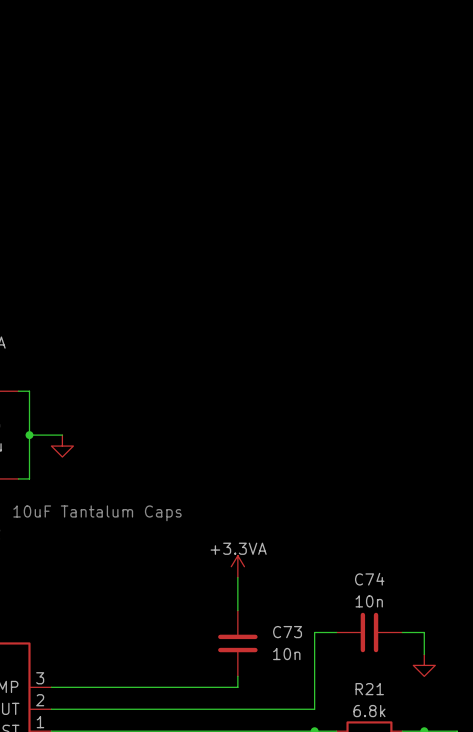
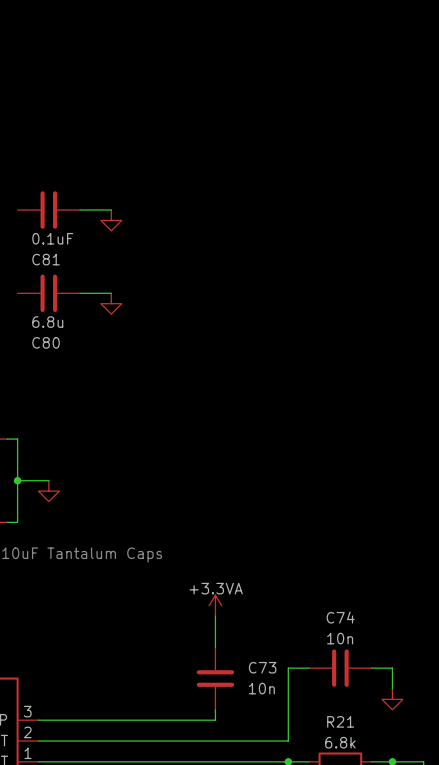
C81: none -> 0.1uF (48, 210)
wire: none -> (80, 210) (111, 210)
power symbol: none -> (111, 220)
C80: none -> 6.8u (48, 293)
wire: none -> (80, 293) (111, 293)
power symbol: none -> (111, 303)

